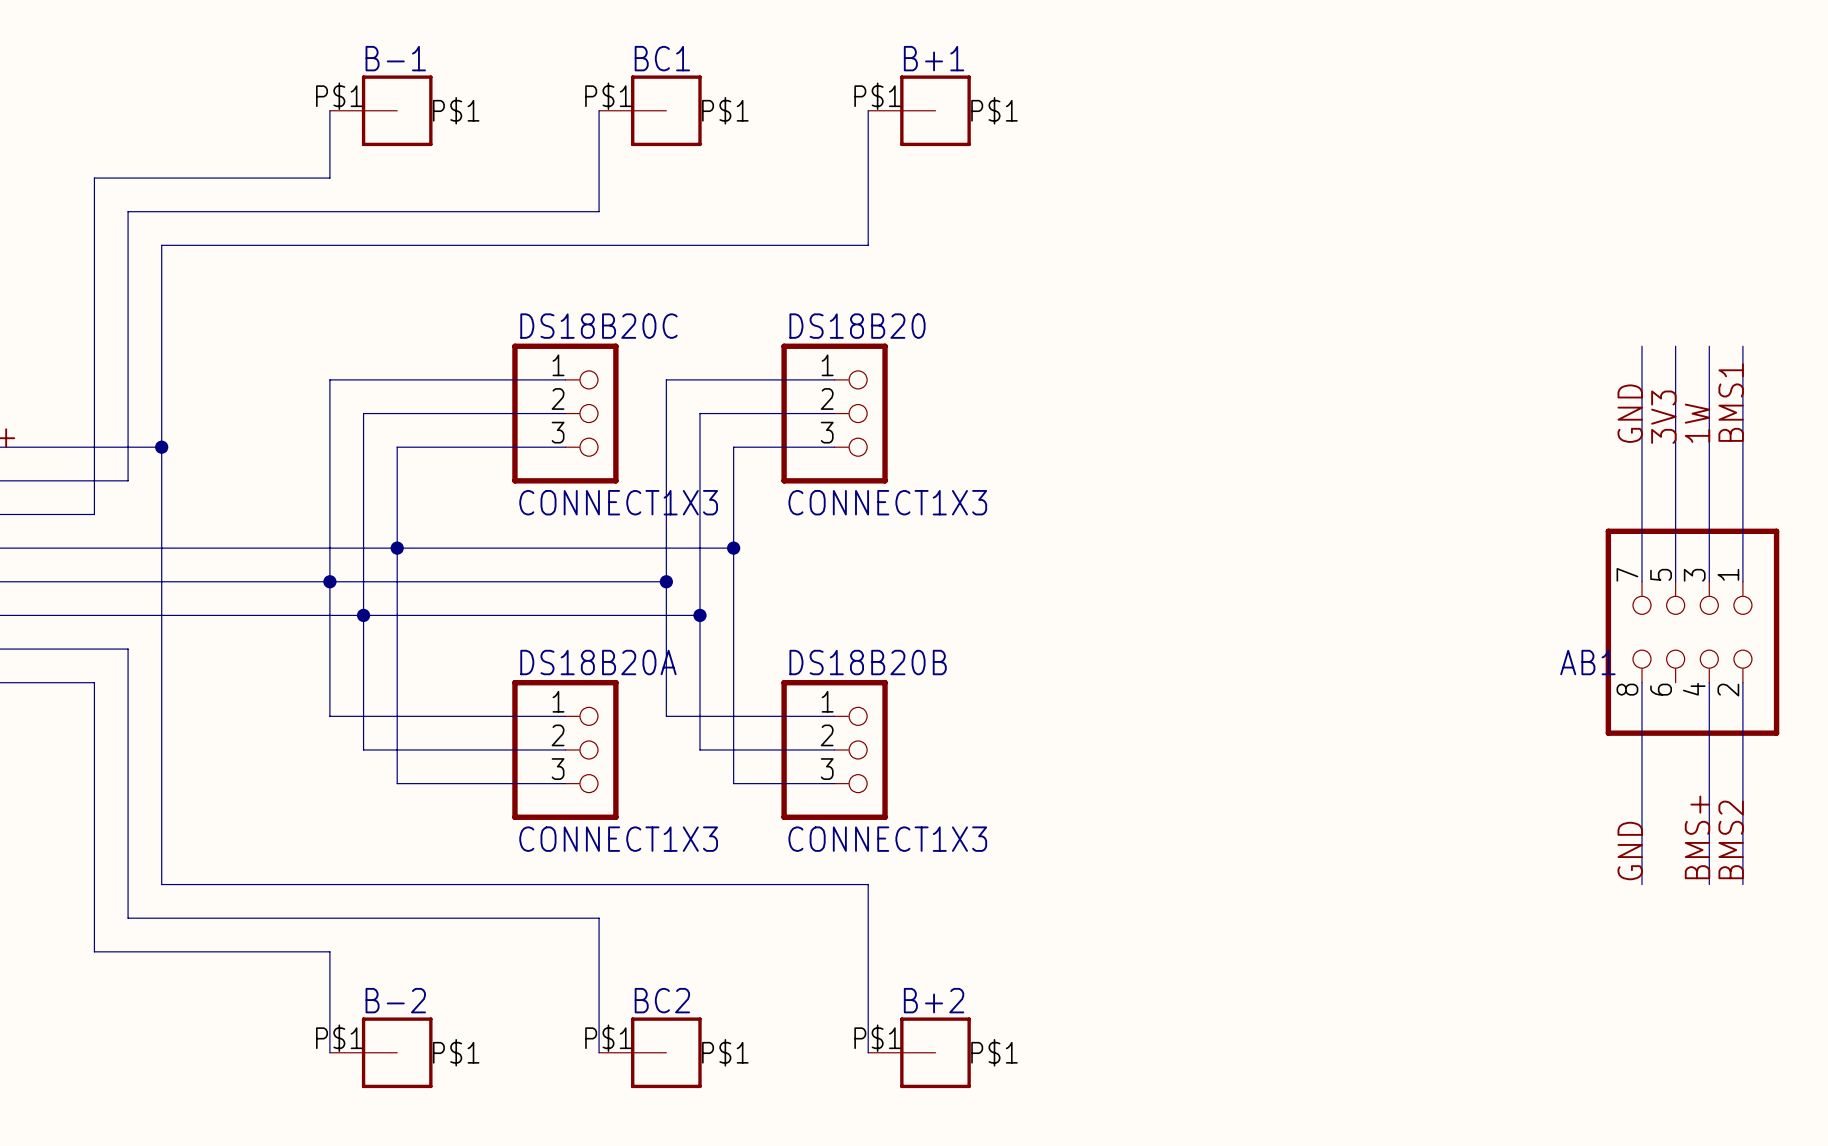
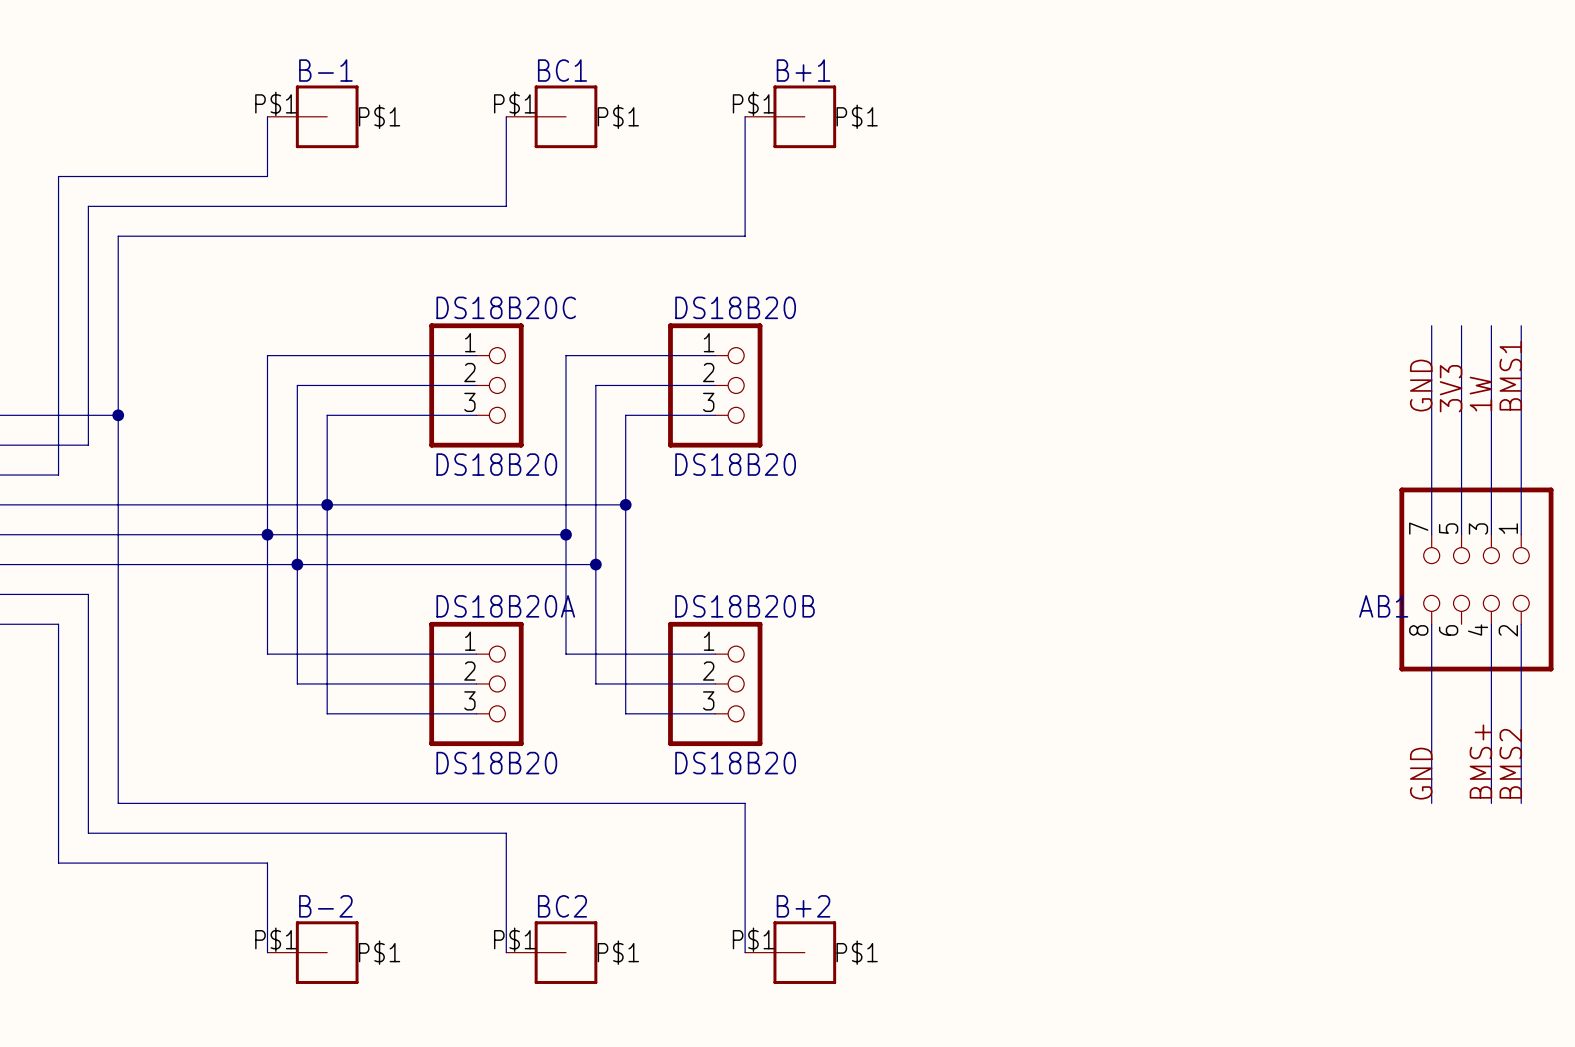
DS18B20C value: CONNECT1X3 (618, 502) -> DS18B20 (496, 464)
DS18B20 value: CONNECT1X3 (887, 502) -> DS18B20 (735, 464)
DS18B20A value: CONNECT1X3 (618, 839) -> DS18B20 (496, 763)
DS18B20B value: CONNECT1X3 (887, 839) -> DS18B20 (735, 763)

